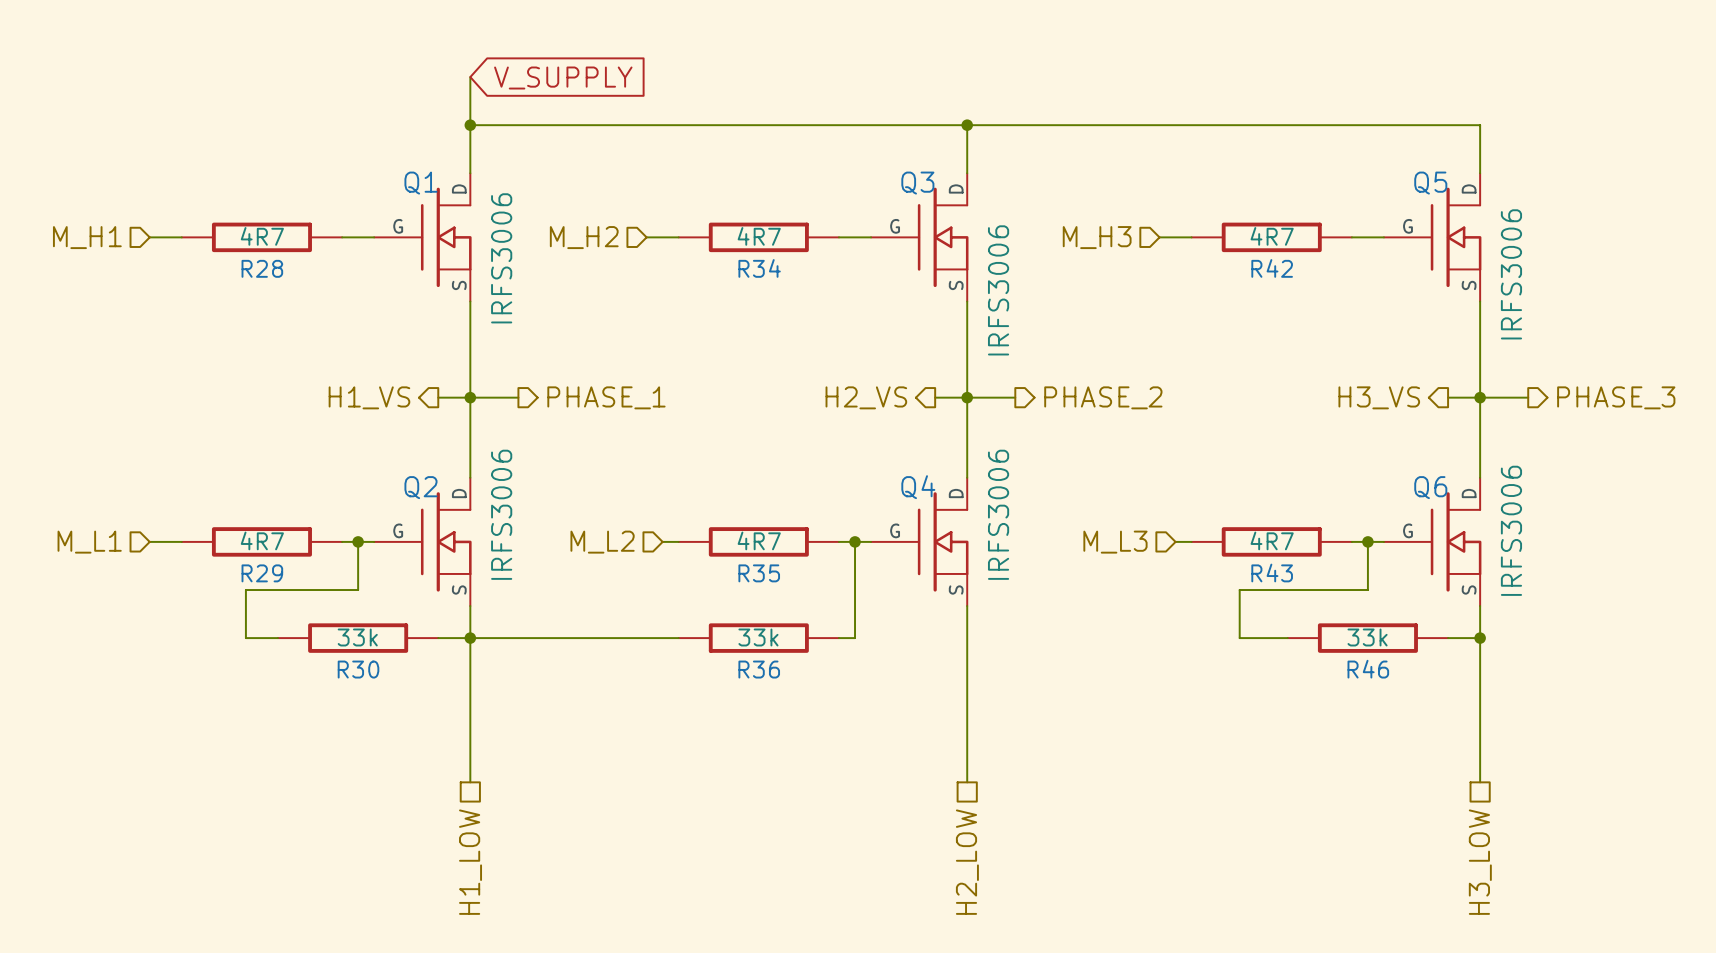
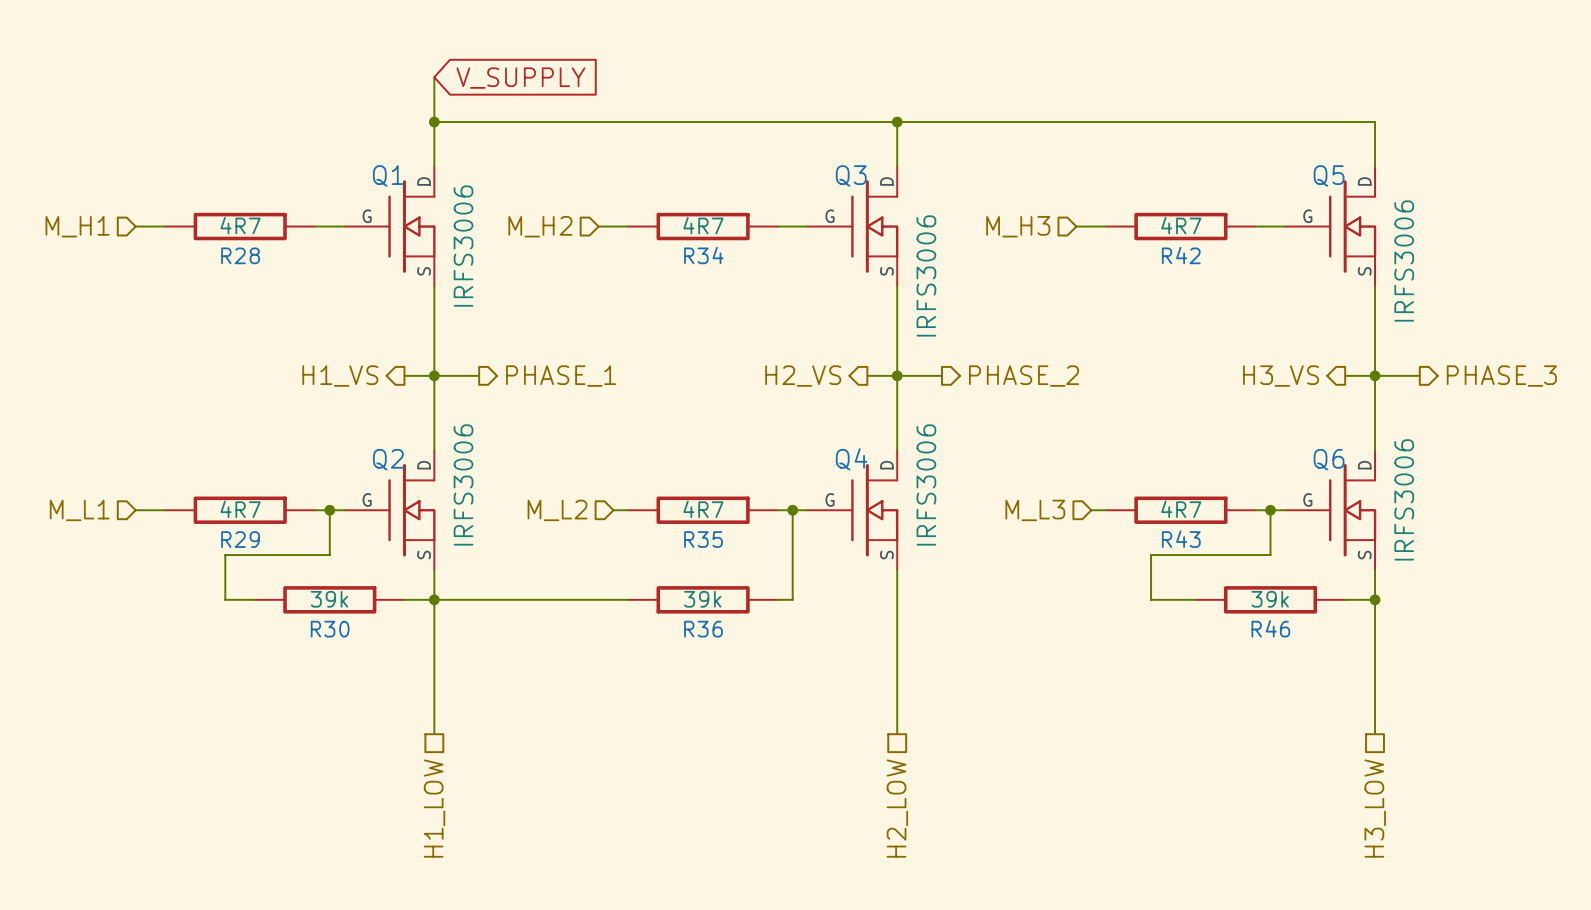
R30 value: 33k (357, 637) -> 39k (329, 599)
R36 value: 33k (758, 637) -> 39k (702, 599)
R46 value: 33k (1367, 637) -> 39k (1270, 599)

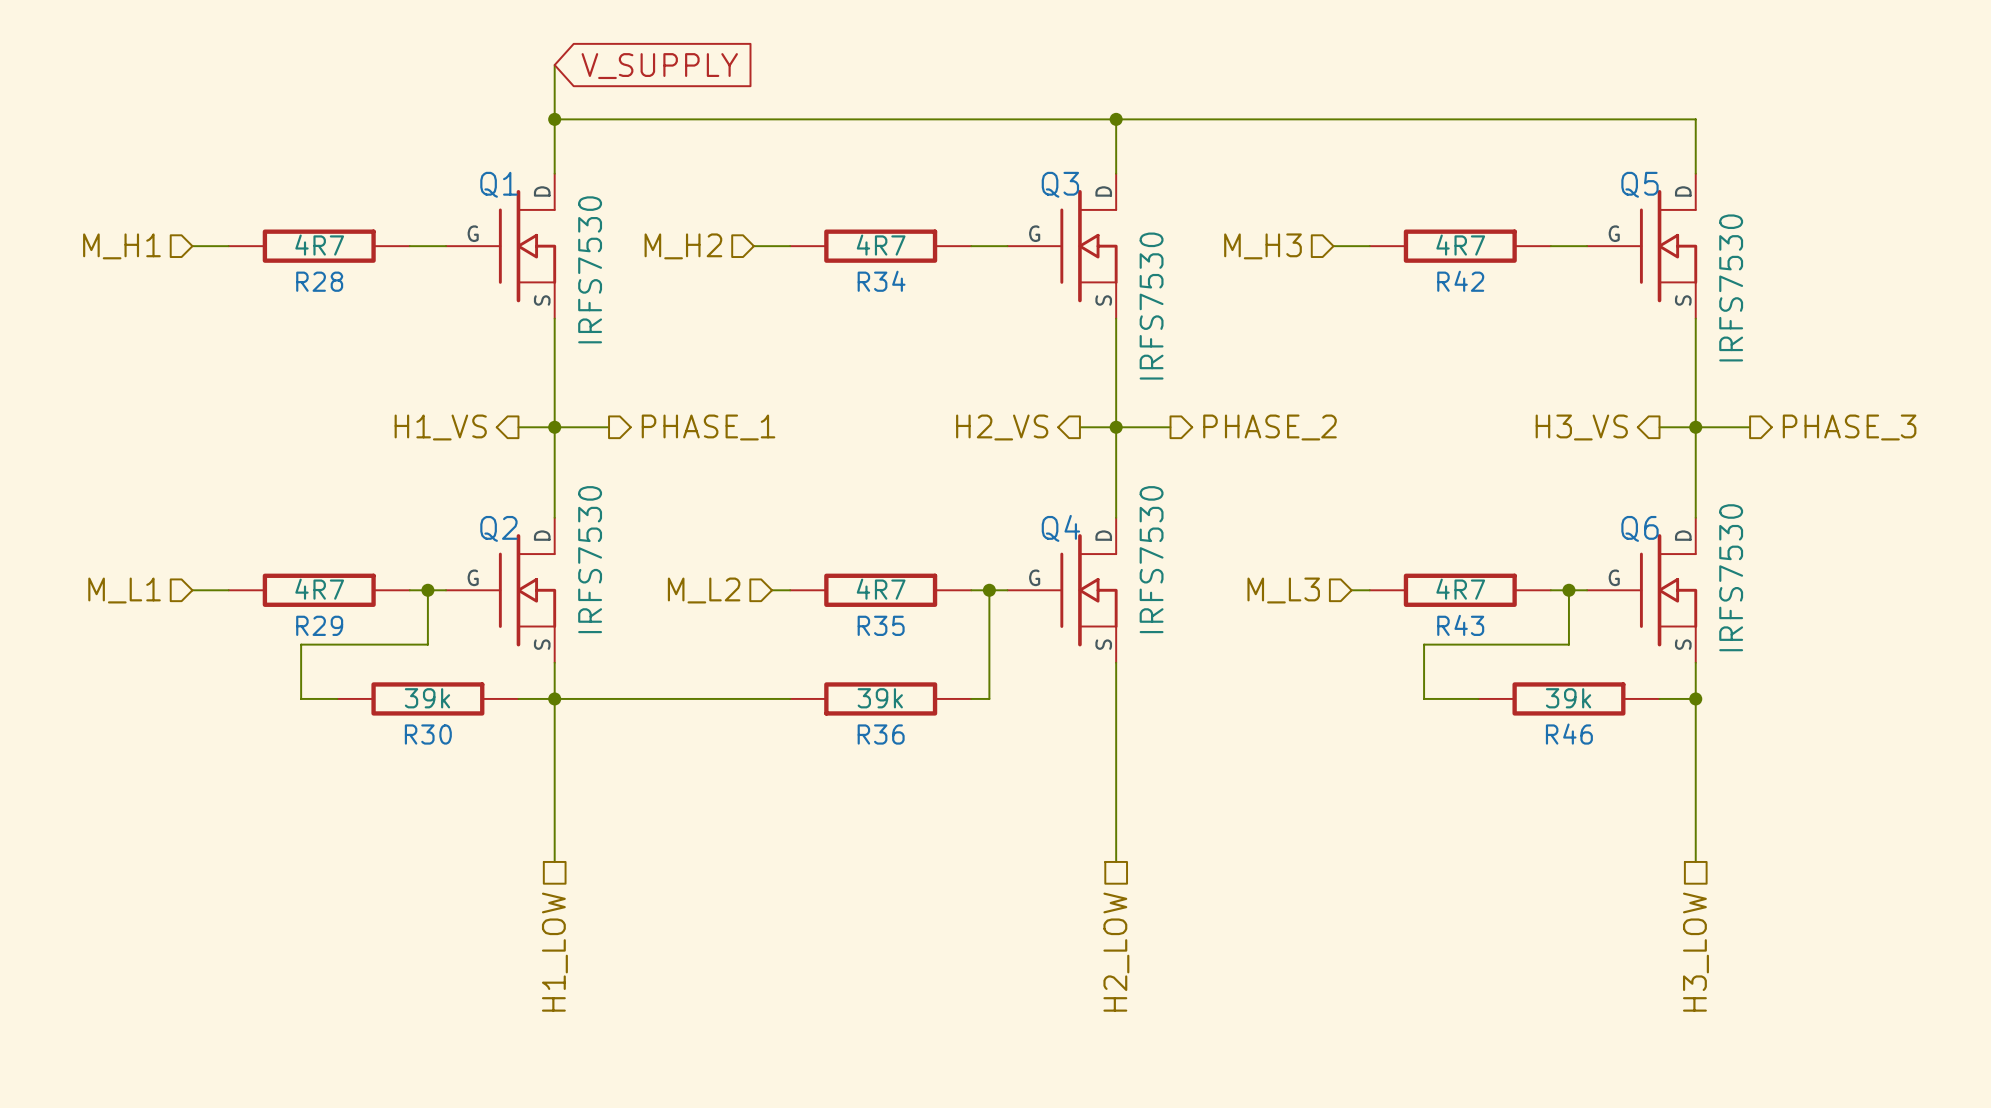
Q1 value: IRFS3006 (463, 246) -> IRFS7530 (590, 269)
Q5 value: IRFS3006 (1404, 261) -> IRFS7530 (1731, 287)
Q3 value: IRFS3006 (926, 275) -> IRFS7530 (1151, 306)
Q2 value: IRFS3006 (463, 484) -> IRFS7530 (590, 559)
Q4 value: IRFS3006 (926, 484) -> IRFS7530 (1151, 559)
Q6 value: IRFS3006 (1404, 499) -> IRFS7530 (1731, 577)

